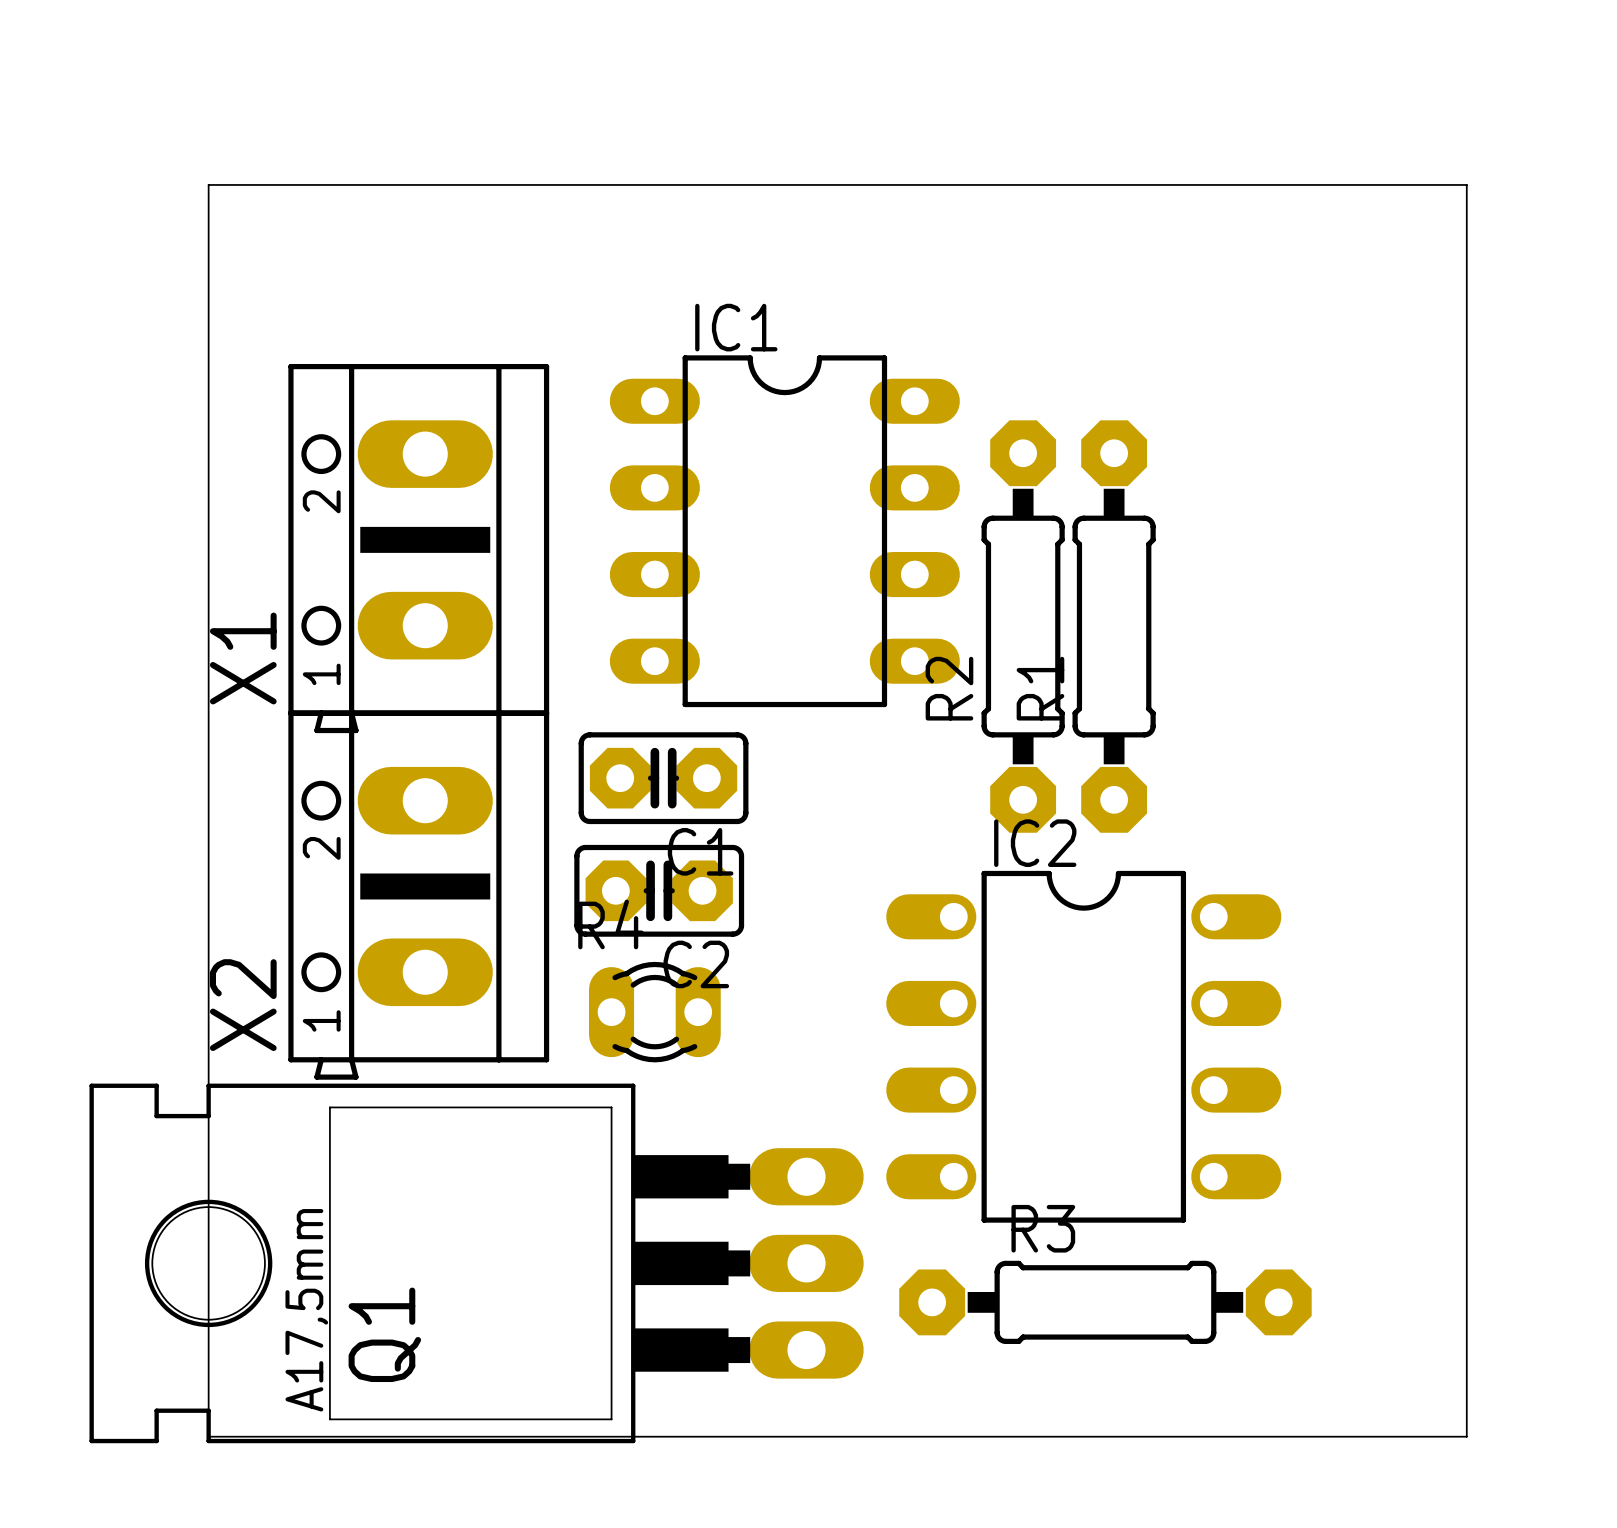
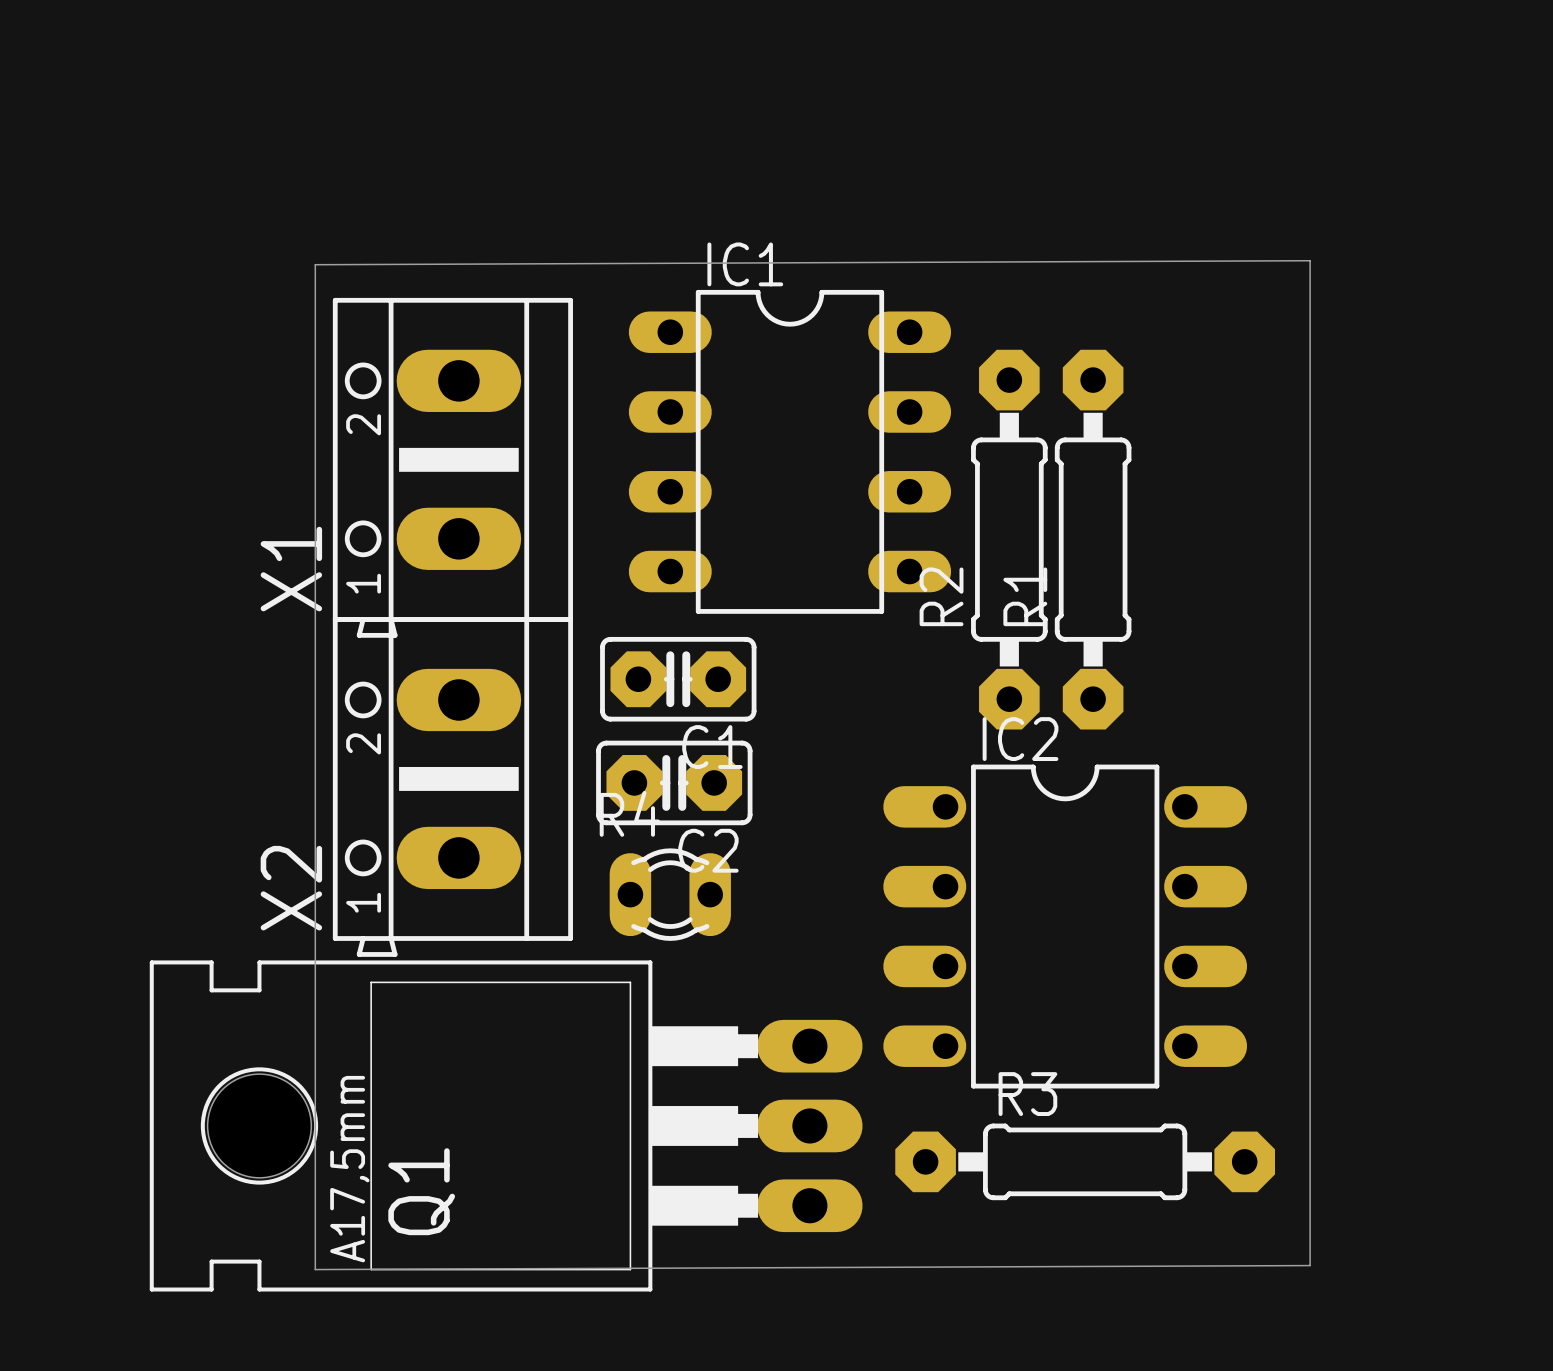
board edge: (208, 184) (208, 1436) (1466, 1436) (1466, 184) (208, 184) -> (1310, 260) (315, 264) (315, 1269) (1310, 1265) (1310, 260)

